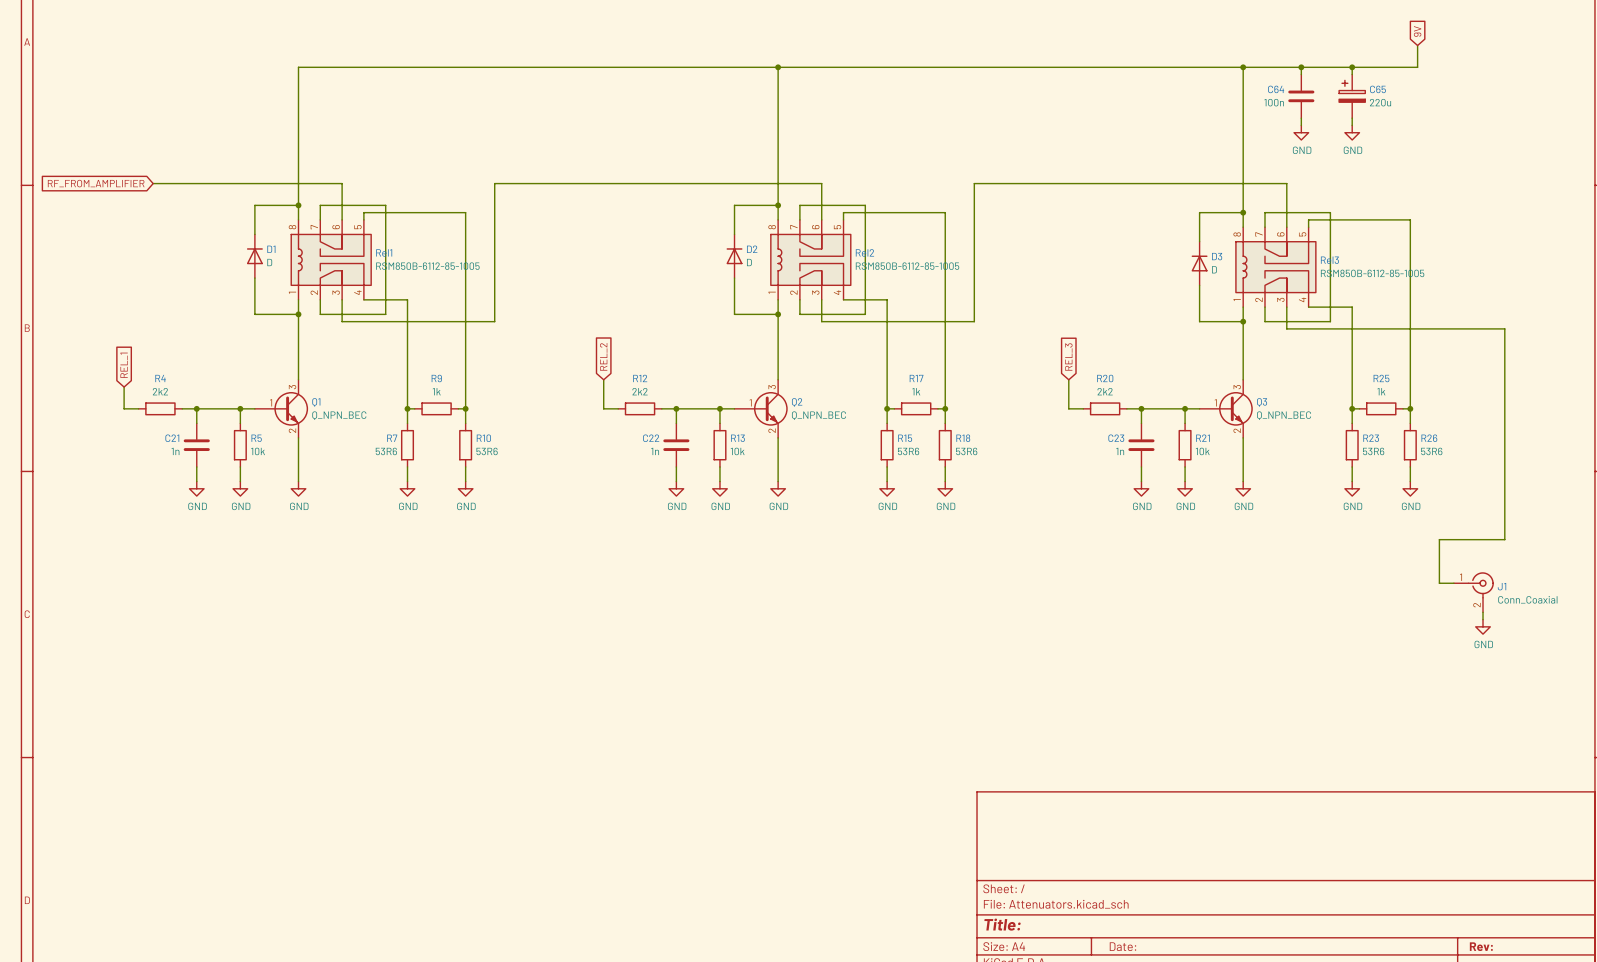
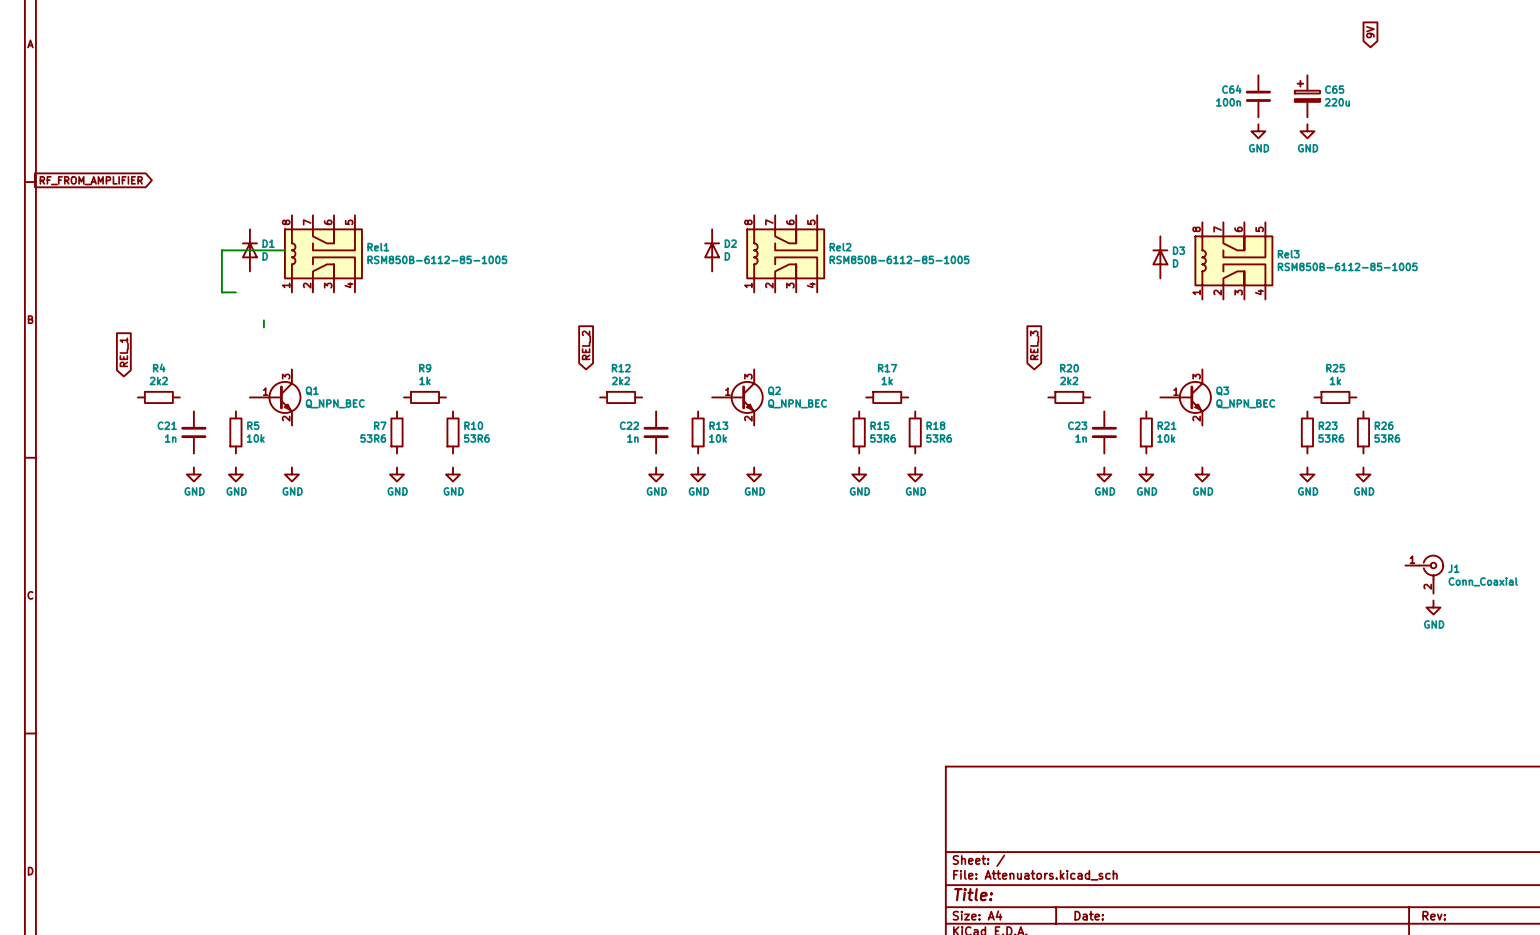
wire: (1417, 45) (1417, 67) (298, 67) (298, 219) -> none
wire: (778, 67) (778, 219) -> none
junction: (778, 67) -> none
wire: (1243, 67) (1243, 227) -> none
junction: (1243, 67) -> none
wire: (1301, 67) (1301, 74) -> none
junction: (1301, 67) -> none
wire: (1352, 67) (1352, 74) -> none
junction: (1352, 67) -> none
wire: (1301, 118) (1301, 125) -> none
wire: (1352, 118) (1352, 125) -> none
wire: (153, 183) (342, 183) (342, 219) -> none
wire: (298, 205) (254, 205) (254, 234) -> none
junction: (298, 205) -> none
wire: (778, 205) (734, 205) (734, 234) -> none
junction: (778, 205) -> none
wire: (1243, 212) (1199, 212) (1199, 241) -> none
junction: (1243, 212) -> none
wire: (320, 219) (320, 205) (385, 205) (385, 314) (320, 314) (320, 299) -> none
wire: (363, 219) (363, 212) (465, 212) (465, 423) -> none
wire: (799, 219) (799, 205) (865, 205) (865, 314) (799, 314) (799, 299) -> none
wire: (821, 219) (821, 183) (494, 183) (494, 321) (342, 321) (342, 299) -> none
wire: (843, 219) (843, 212) (945, 212) (945, 423) -> none
wire: (1264, 227) (1264, 212) (1330, 212) (1330, 321) (1264, 321) (1264, 307) -> none
wire: (1286, 227) (1286, 183) (974, 183) (974, 321) (821, 321) (821, 299) -> none
wire: (1308, 227) (1308, 219) (1410, 219) (1410, 423) -> none
wire: none -> (284, 250) (221, 250) (221, 292) (235, 292)
wire: (254, 278) (254, 314) (298, 314) -> none
wire: (734, 278) (734, 314) (778, 314) -> none
wire: (1199, 285) (1199, 321) (1243, 321) -> none
wire: (298, 299) (298, 379) -> none
wire: (363, 299) (407, 299) (407, 423) -> none
wire: (778, 299) (778, 379) -> none
wire: (843, 299) (887, 299) (887, 423) -> none
wire: (1243, 307) (1243, 379) -> none
wire: (1286, 307) (1286, 328) (1504, 328) (1504, 539) (1439, 539) (1439, 583) (1453, 583) -> none
wire: (1308, 307) (1352, 307) (1352, 423) -> none
junction: (298, 314) -> none
junction: (778, 314) -> none
junction: (1243, 321) -> none
wire: none -> (263, 320) (263, 327)
wire: (603, 379) (603, 408) (618, 408) -> none
wire: (1068, 379) (1068, 408) (1083, 408) -> none
wire: (124, 387) (124, 408) (138, 408) -> none
wire: (182, 408) (254, 408) -> none
wire: (196, 408) (196, 423) -> none
junction: (196, 408) -> none
wire: (240, 408) (240, 423) -> none
junction: (240, 408) -> none
wire: (407, 408) (414, 408) -> none
junction: (407, 408) -> none
wire: (458, 408) (465, 408) -> none
junction: (465, 408) -> none
wire: (661, 408) (734, 408) -> none
wire: (676, 408) (676, 423) -> none
junction: (676, 408) -> none
wire: (719, 408) (719, 423) -> none
junction: (719, 408) -> none
wire: (887, 408) (894, 408) -> none
junction: (887, 408) -> none
wire: (937, 408) (945, 408) -> none
junction: (945, 408) -> none
wire: (1126, 408) (1199, 408) -> none
wire: (1141, 408) (1141, 423) -> none
junction: (1141, 408) -> none
wire: (1185, 408) (1185, 423) -> none
junction: (1185, 408) -> none
wire: (1352, 408) (1359, 408) -> none
junction: (1352, 408) -> none
wire: (1403, 408) (1410, 408) -> none
junction: (1410, 408) -> none
wire: (298, 437) (298, 481) -> none
wire: (778, 437) (778, 481) -> none
wire: (1243, 437) (1243, 481) -> none
wire: (196, 466) (196, 481) -> none
wire: (240, 466) (240, 481) -> none
wire: (407, 466) (407, 481) -> none
wire: (465, 466) (465, 481) -> none
wire: (676, 466) (676, 481) -> none
wire: (719, 466) (719, 481) -> none
wire: (887, 466) (887, 481) -> none
wire: (945, 466) (945, 481) -> none
wire: (1141, 466) (1141, 481) -> none
wire: (1185, 466) (1185, 481) -> none
wire: (1352, 466) (1352, 481) -> none
wire: (1410, 466) (1410, 481) -> none
wire: (1483, 612) (1483, 619) -> none

